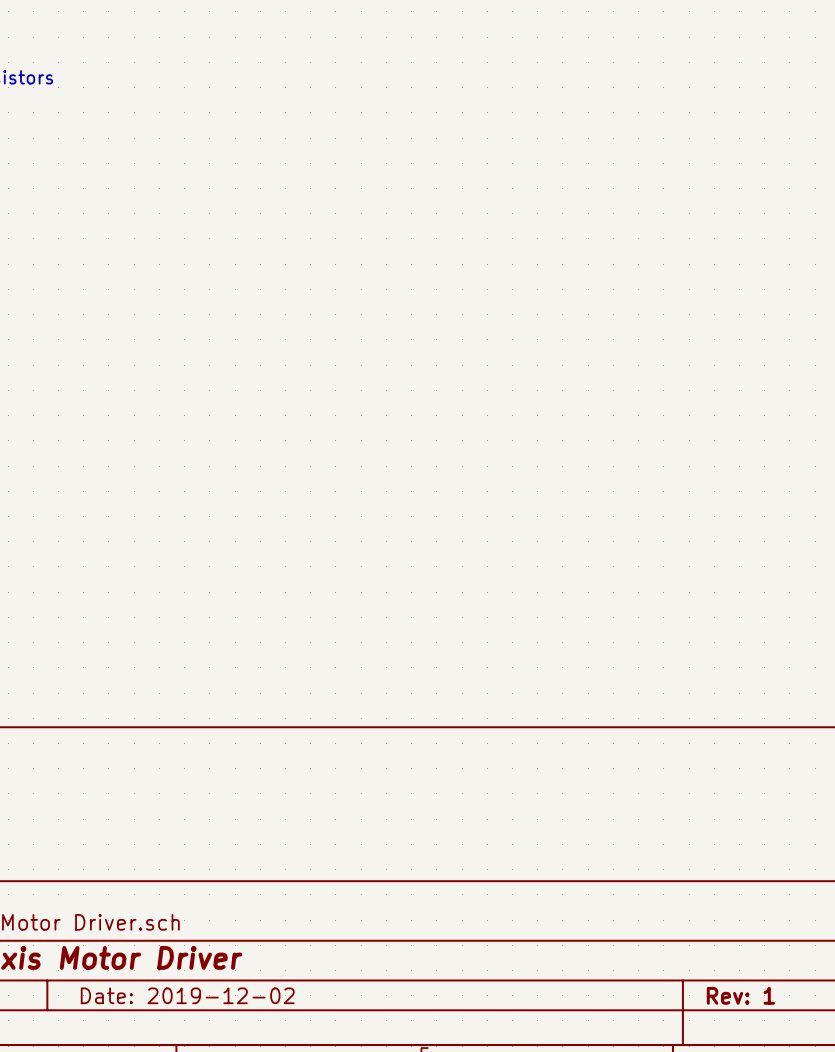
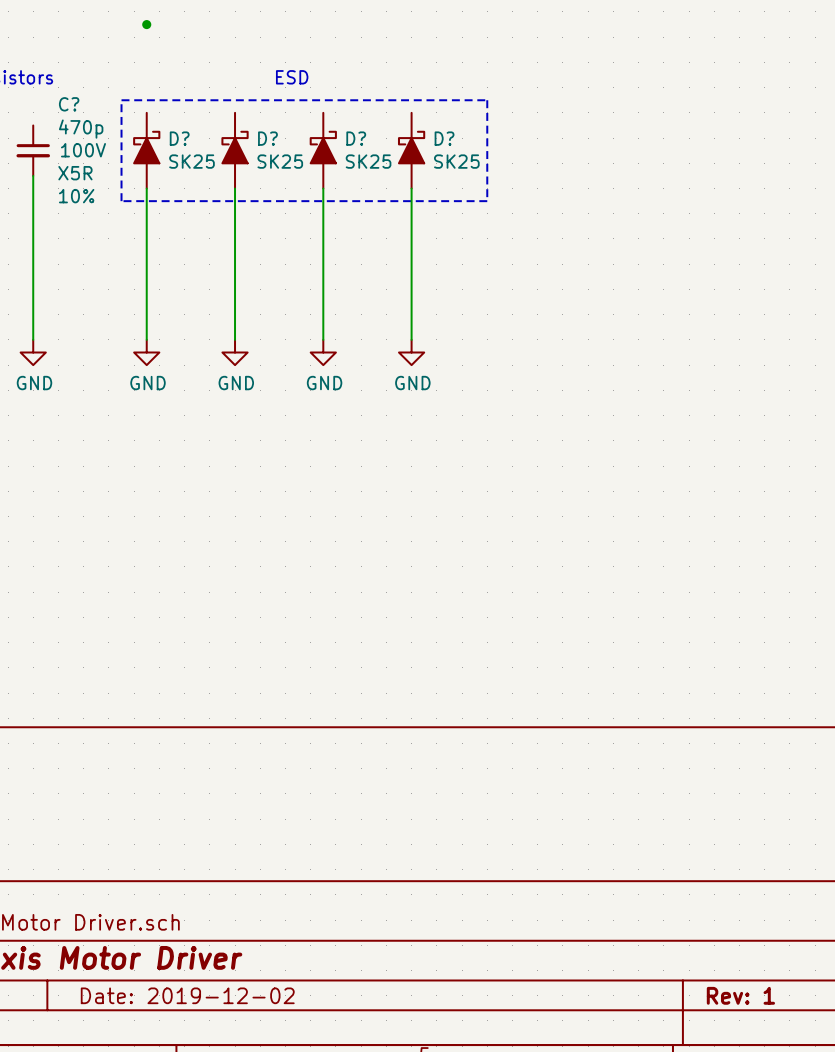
junction: none -> (146, 24)
text: none -> ESD (292, 77)
line: none -> (121, 100) (121, 201) (487, 201) (487, 100) (121, 100)
C?: none -> 470p (33, 150)
D?: none -> SK25 (146, 150)
D?: none -> SK25 (235, 150)
D?: none -> SK25 (323, 150)
D?: none -> SK25 (411, 150)
wire: none -> (33, 175) (33, 339)
wire: none -> (146, 188) (146, 339)
wire: none -> (235, 188) (235, 339)
wire: none -> (323, 188) (323, 339)
wire: none -> (411, 188) (411, 339)
power symbol: none -> GND (33, 352)
power symbol: none -> GND (146, 352)
power symbol: none -> GND (235, 352)
power symbol: none -> GND (323, 352)
power symbol: none -> GND (411, 352)

